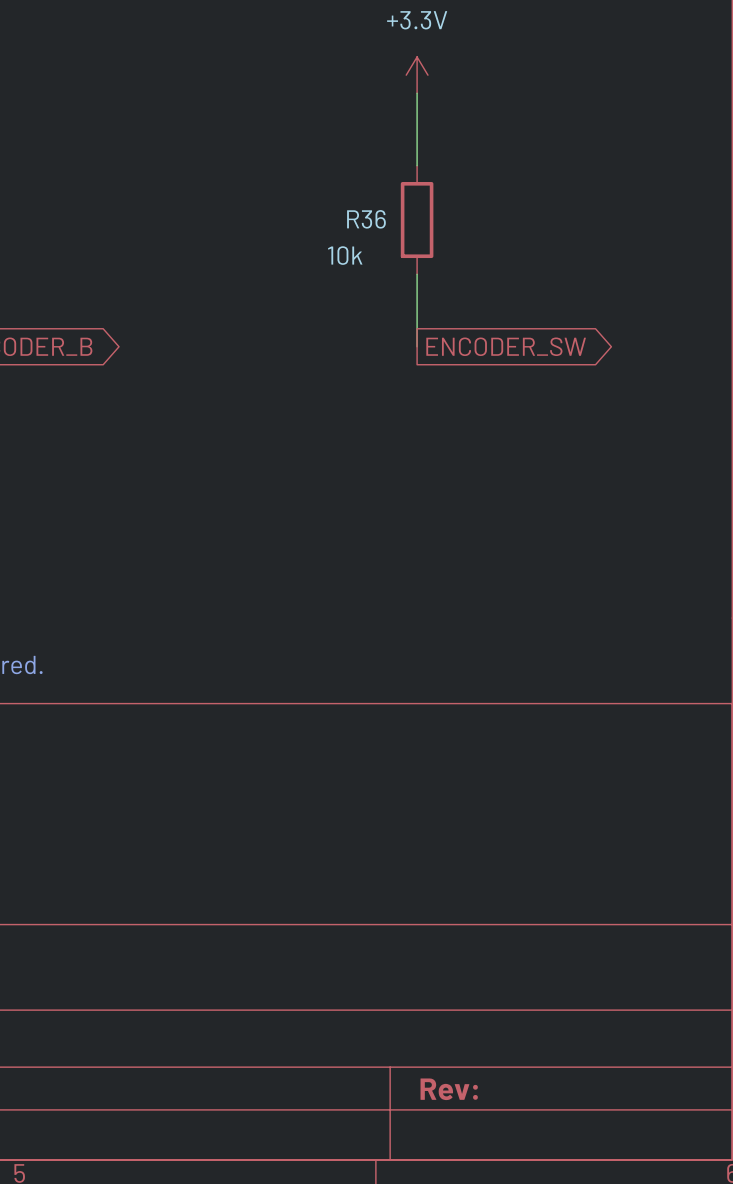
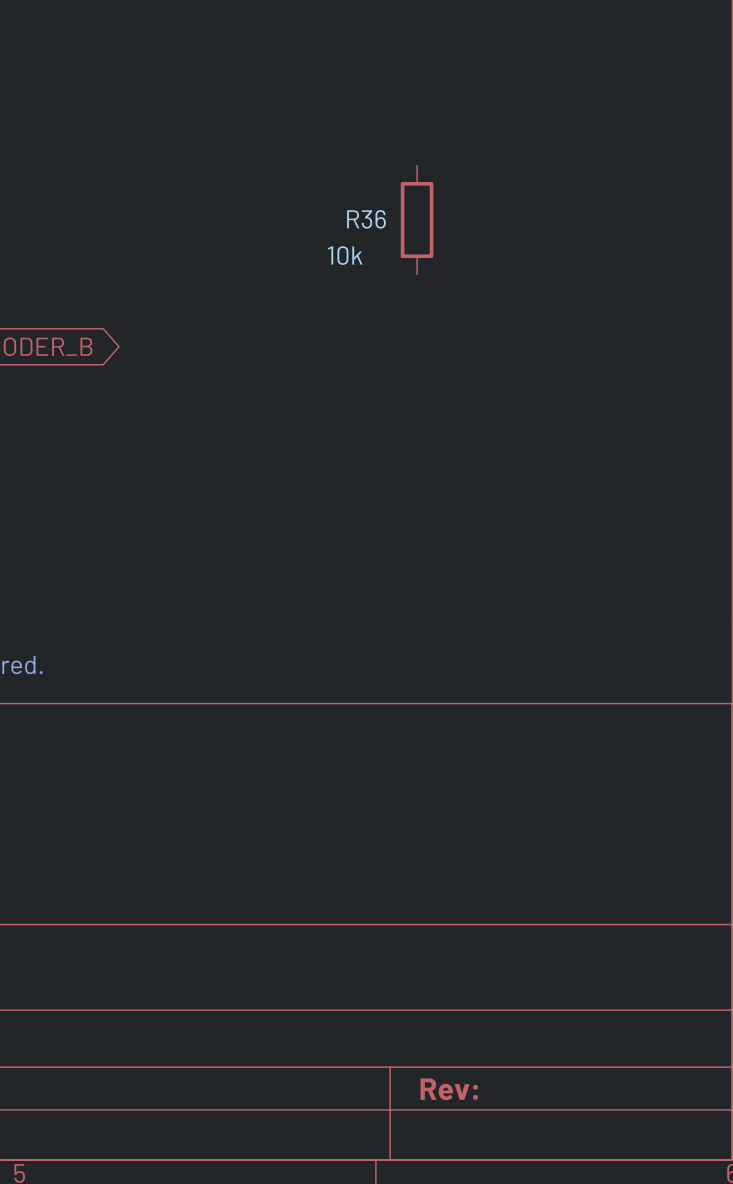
power symbol: +3.3V (417, 75) -> none
wire: (417, 93) (417, 165) -> none
wire: (417, 274) (417, 346) -> none
global label: ENCODER_SW (506, 346) -> none

